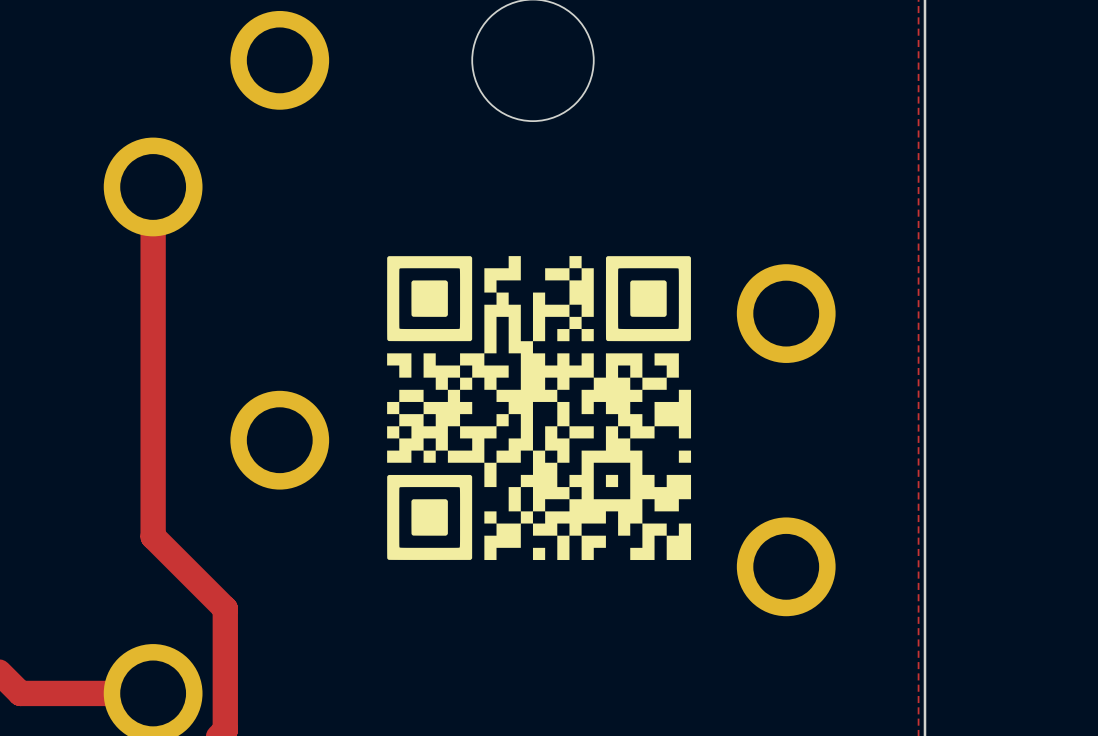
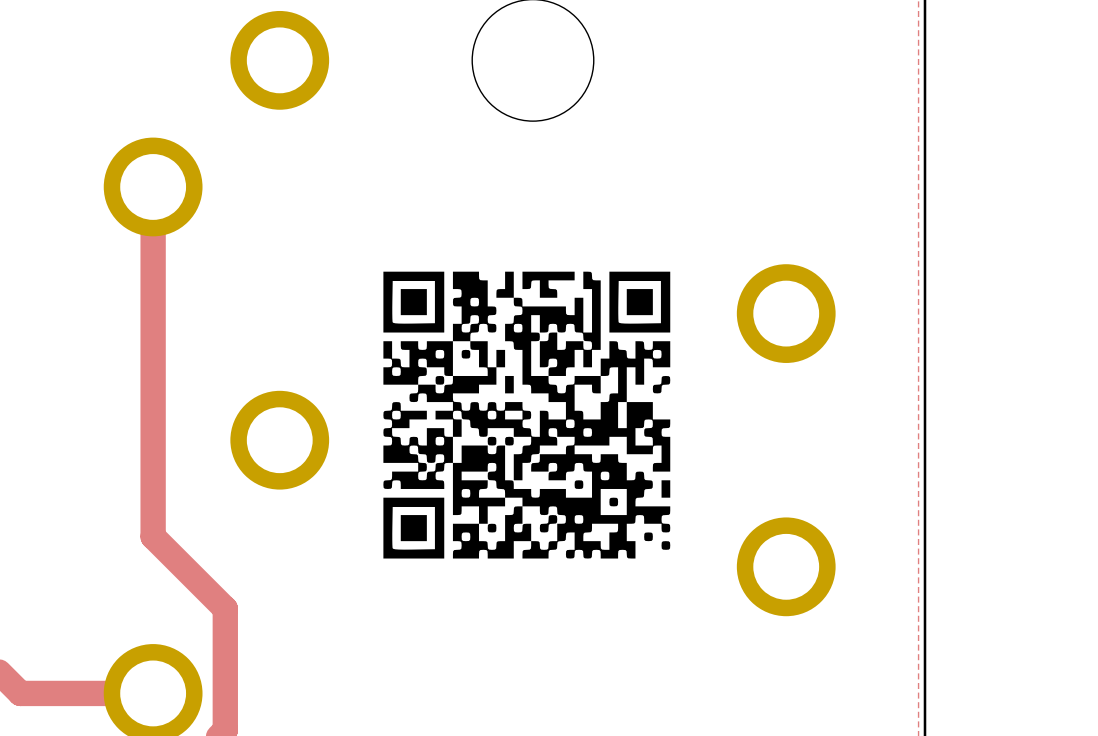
drawing shape: [387, 256, 692, 561] -> [383, 271, 671, 559]

